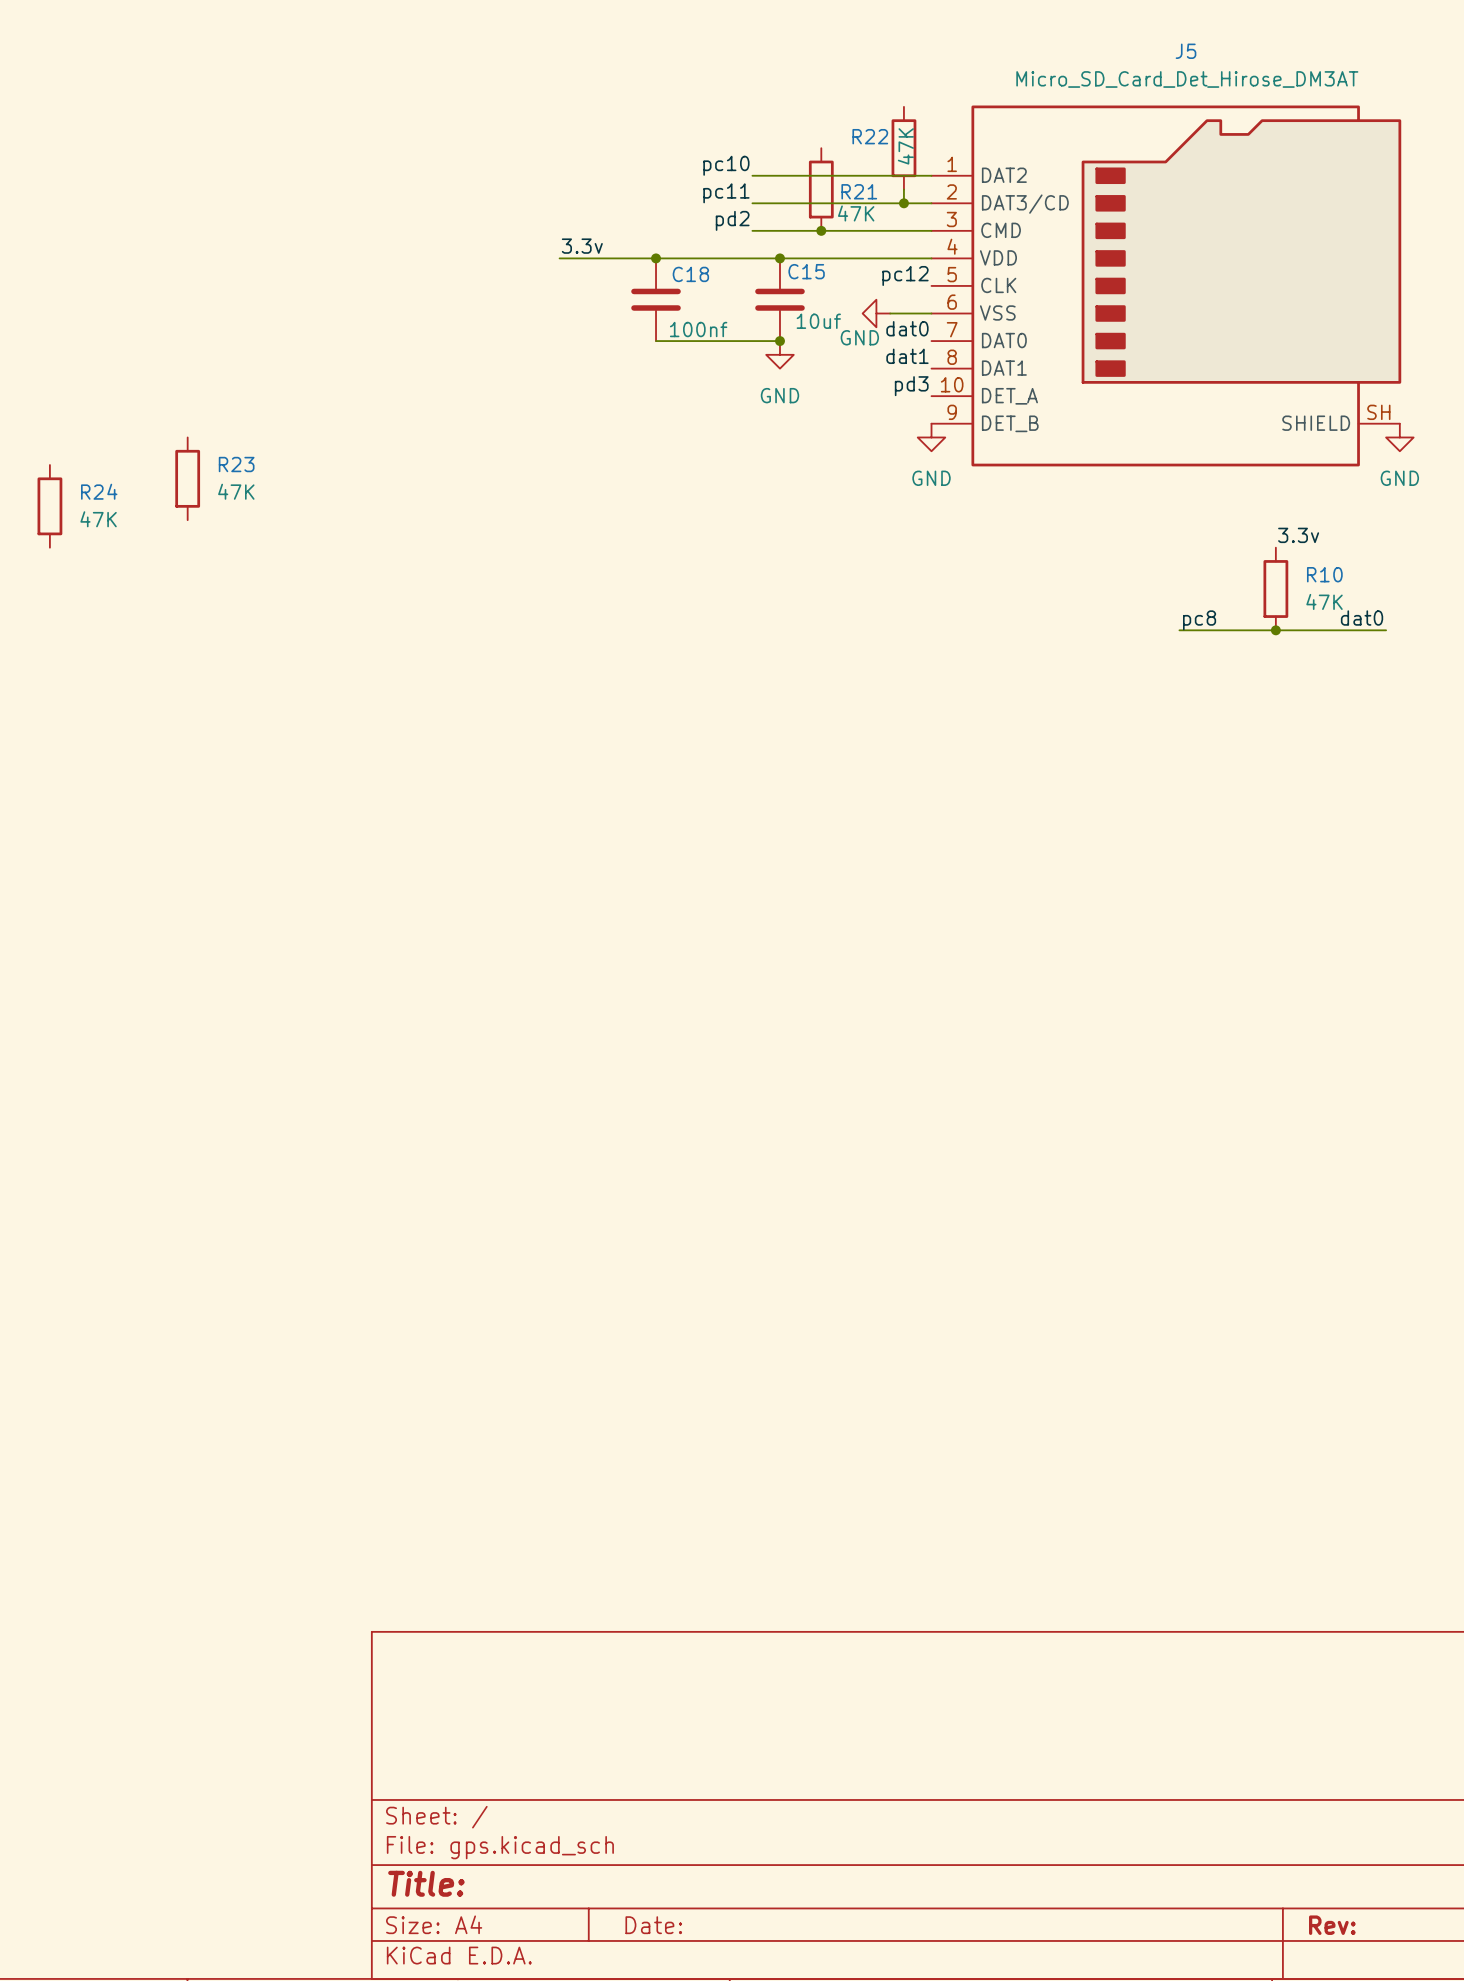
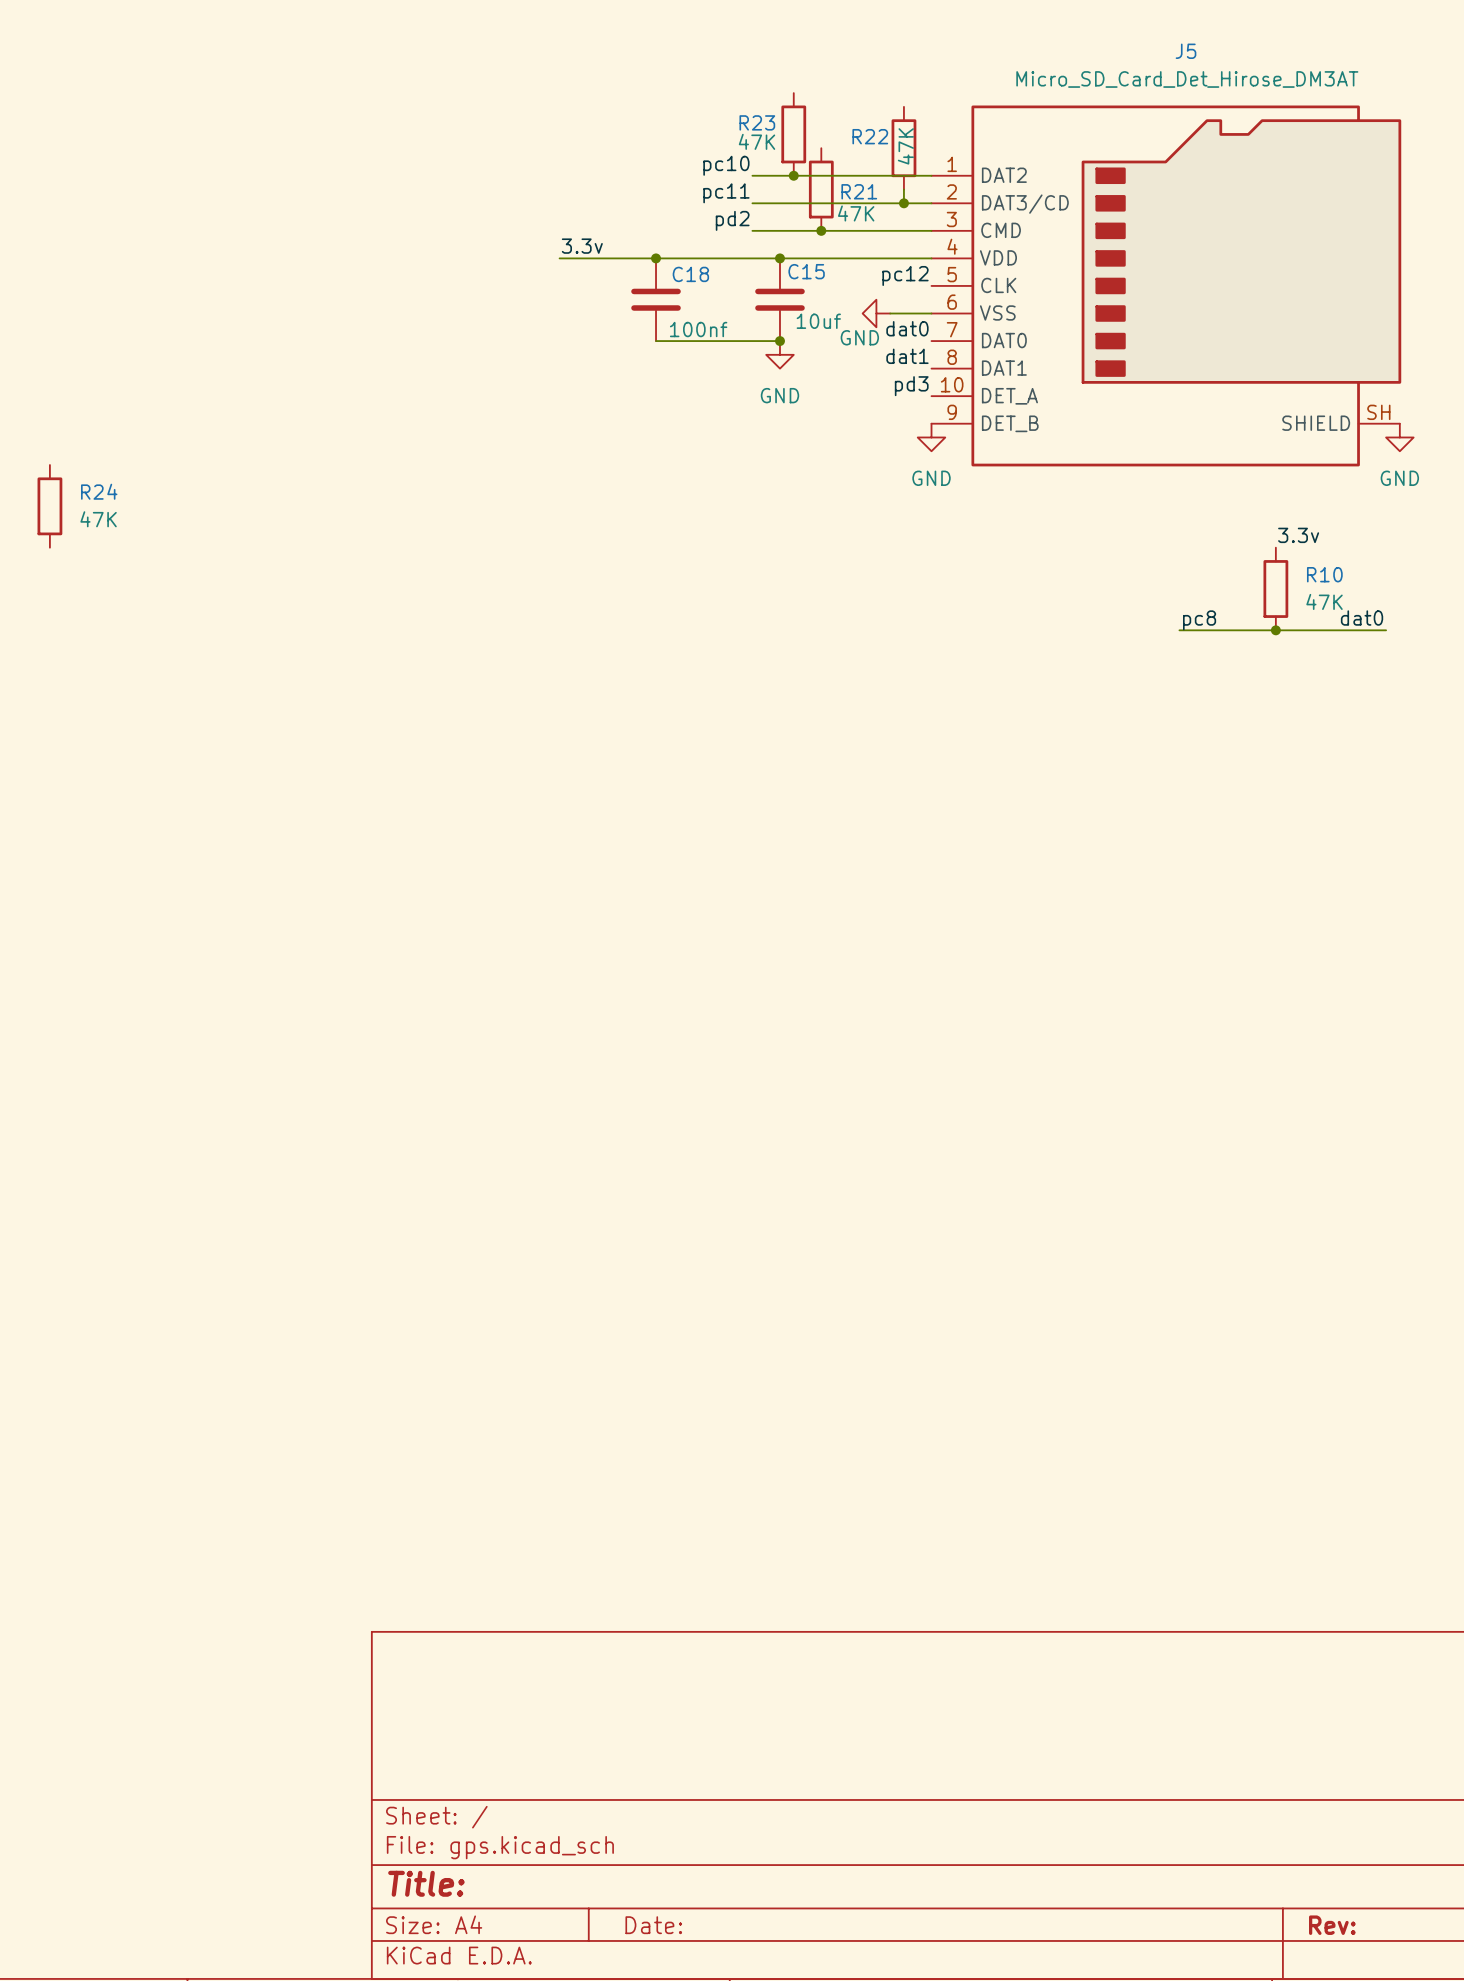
junction: none -> (793, 175)
R23 name position: R23 (236, 464) -> R23 (757, 122)
R23 position: (187, 478) -> (793, 134)
R23 value position: 47K (236, 491) -> 47K (757, 141)

